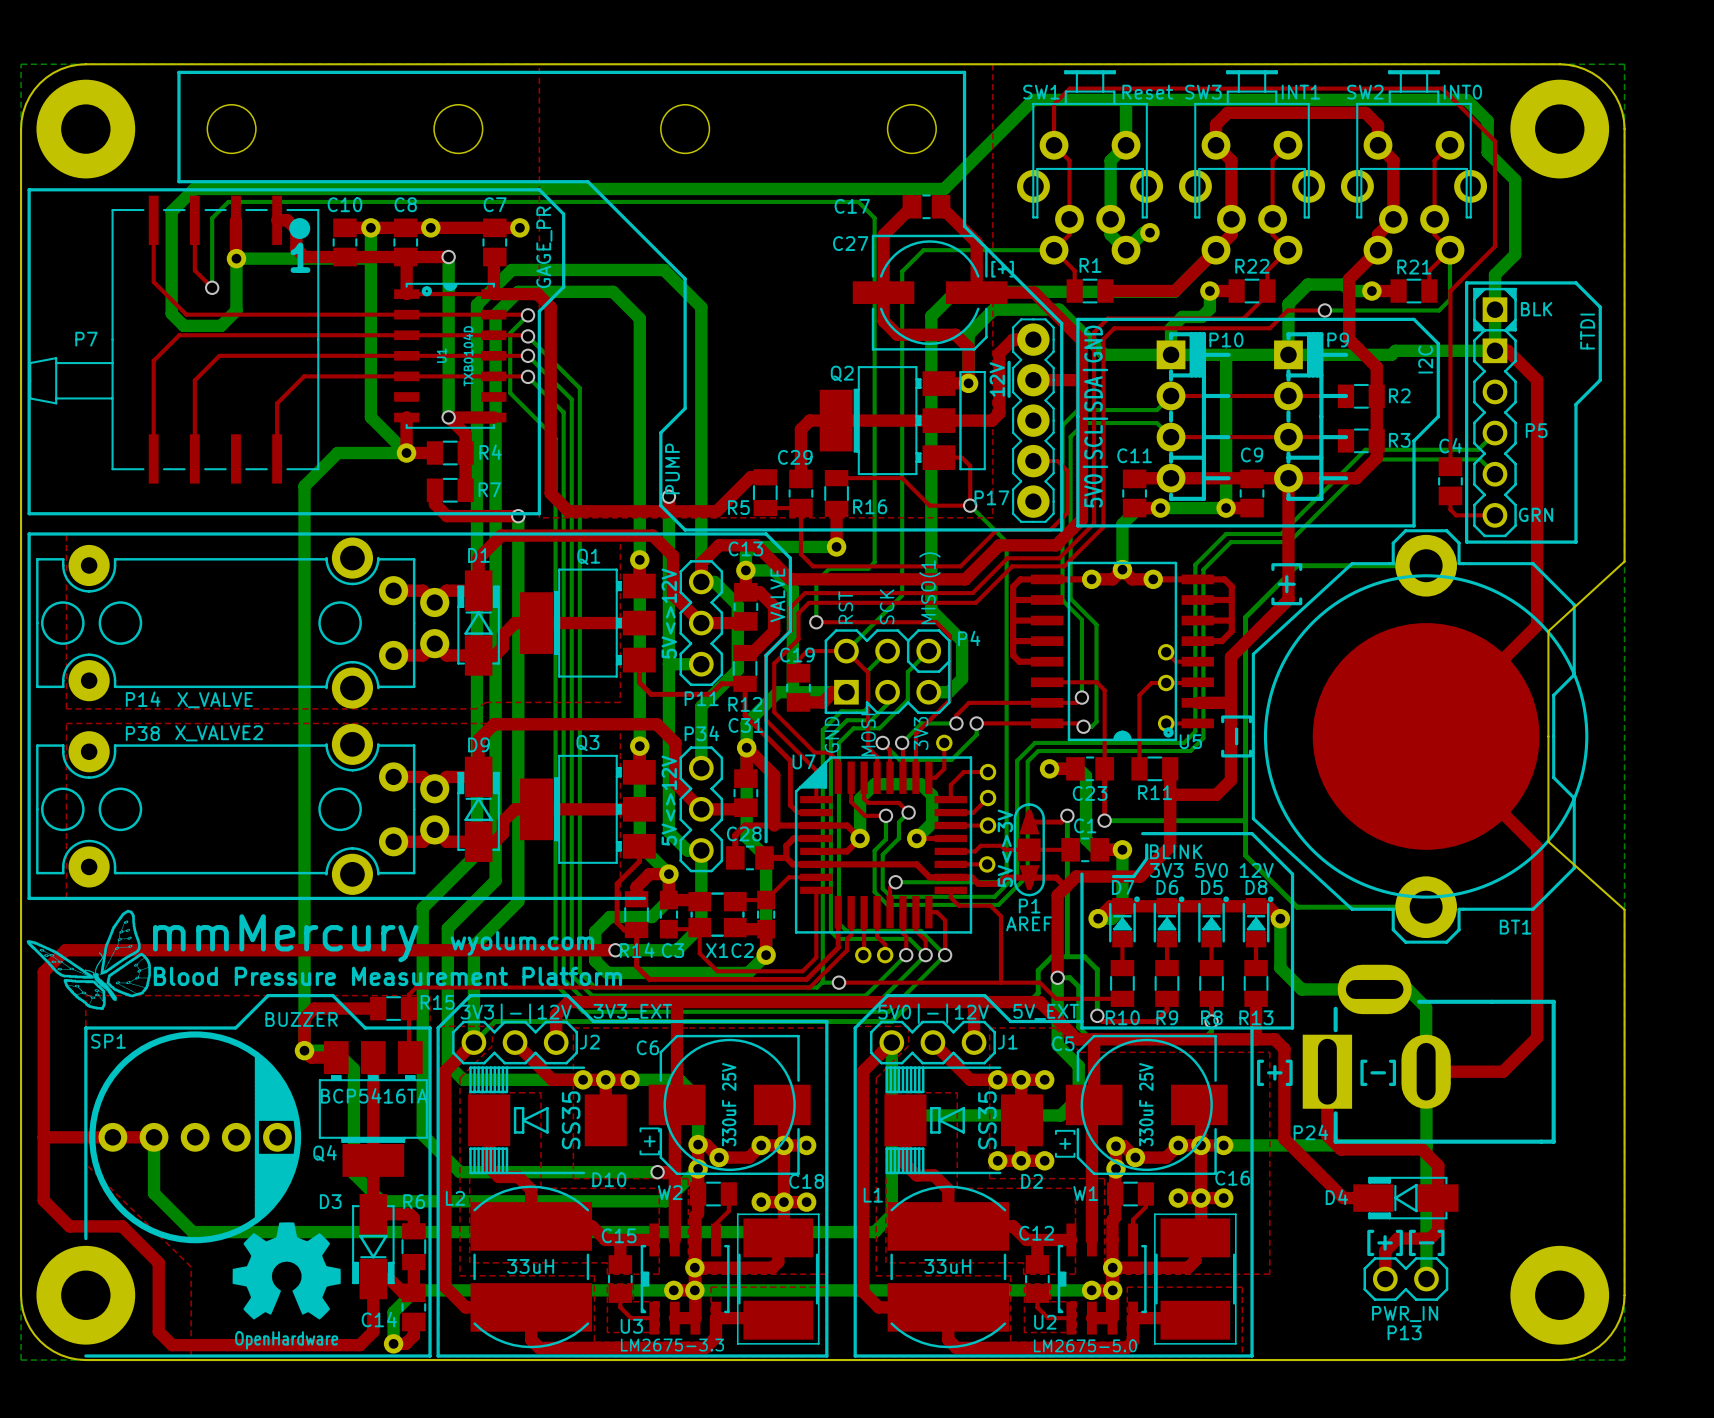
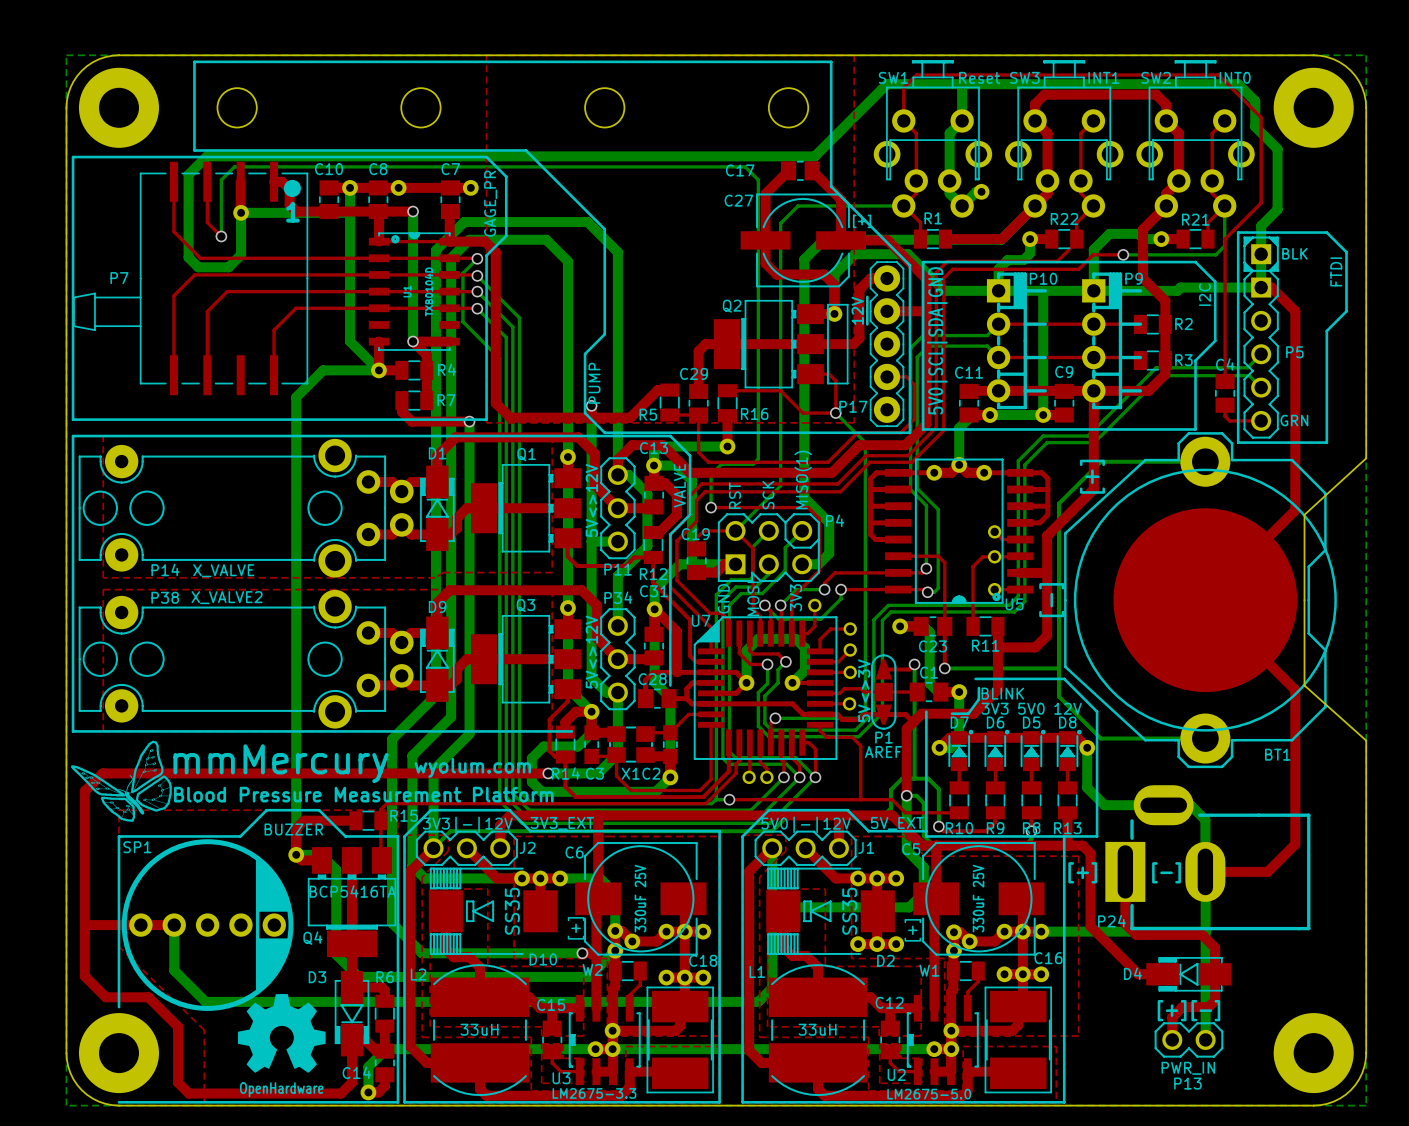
P7 footprint: [29, 195, 320, 484] -> [73, 161, 309, 396]

